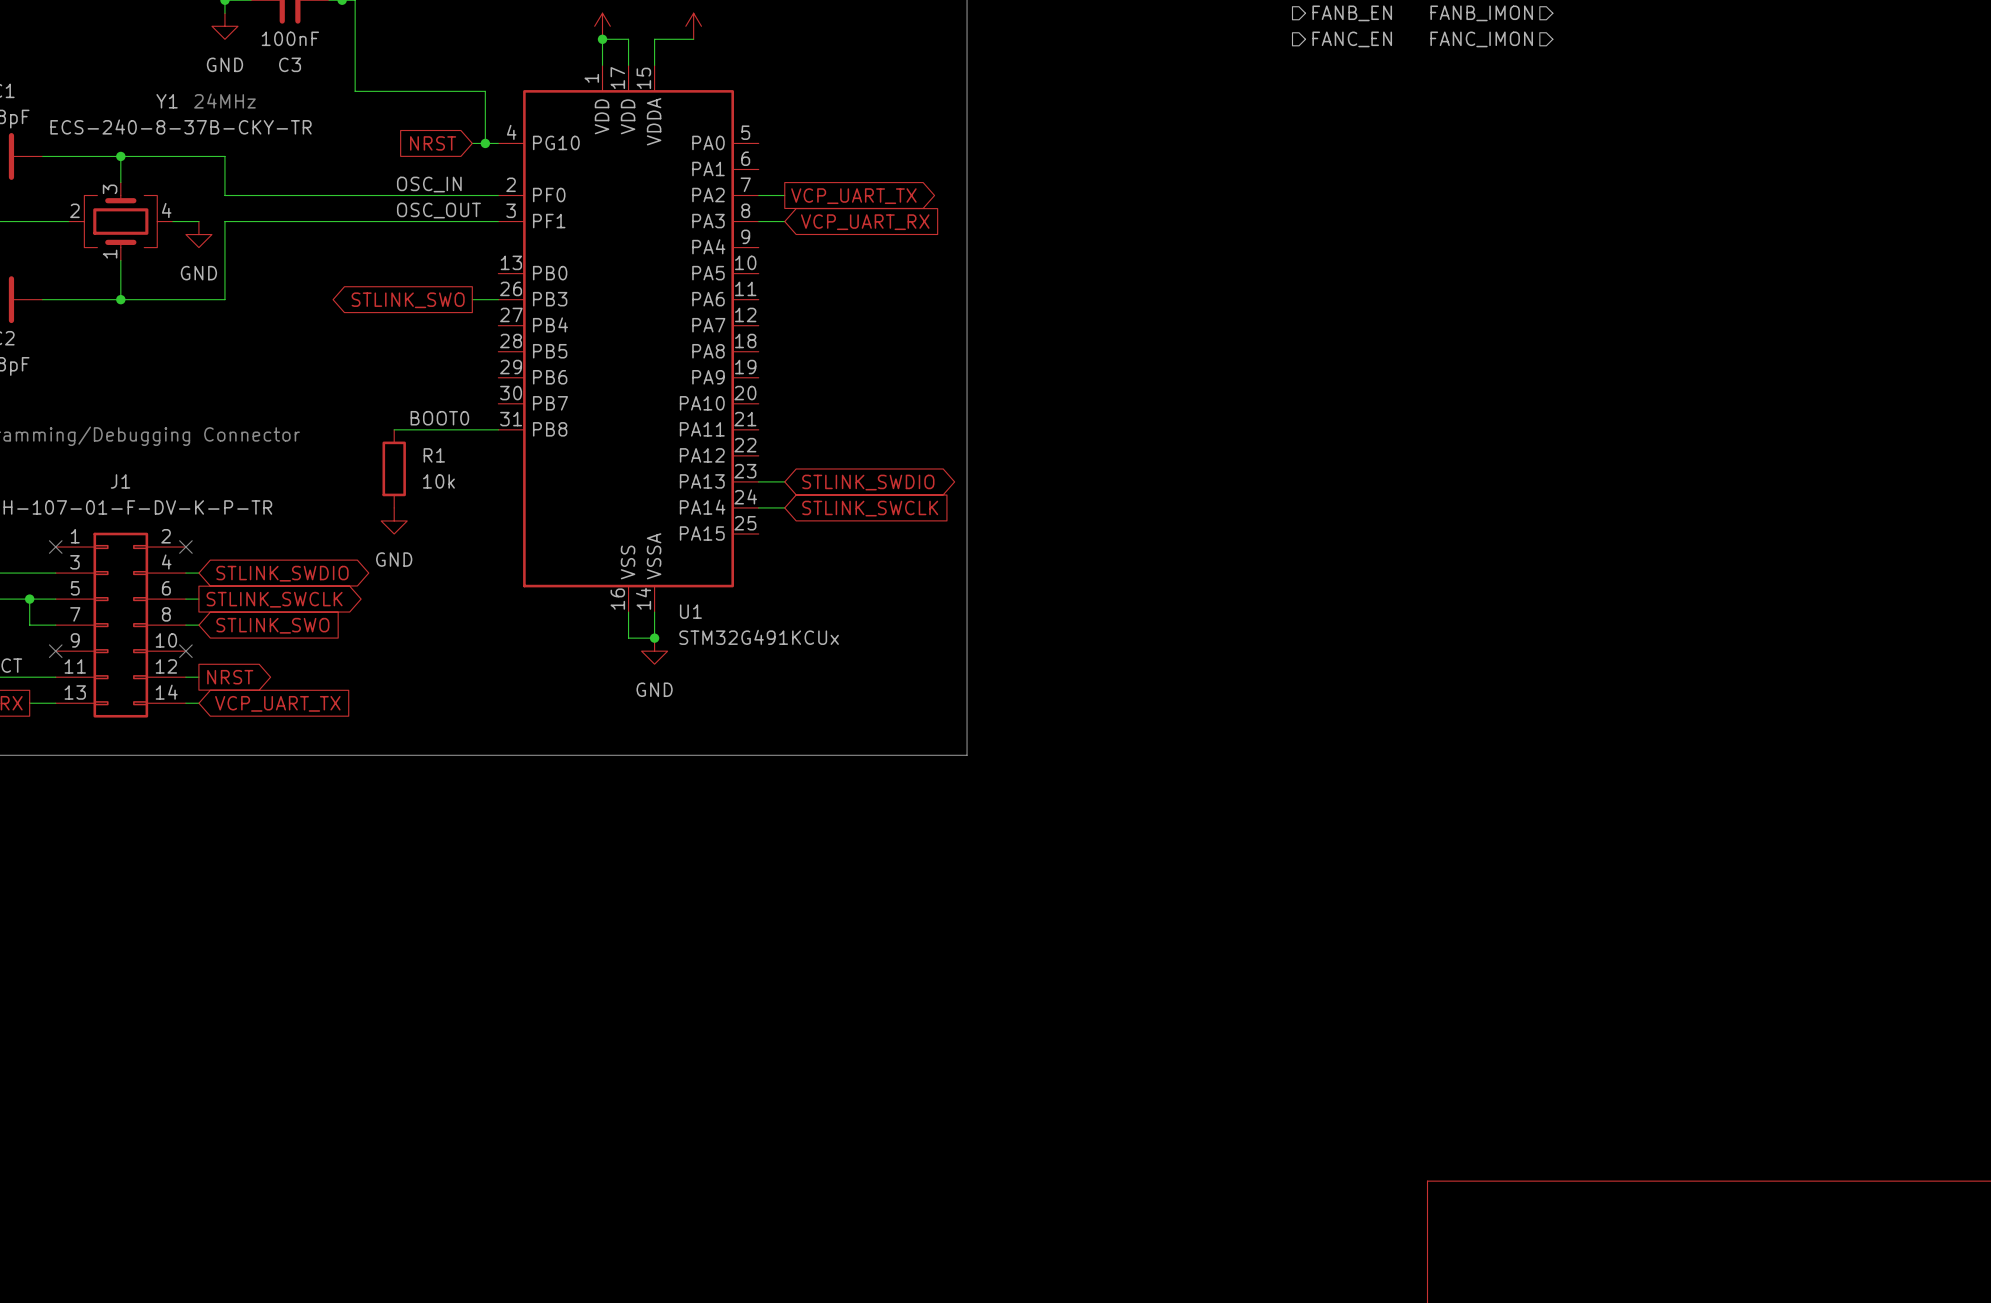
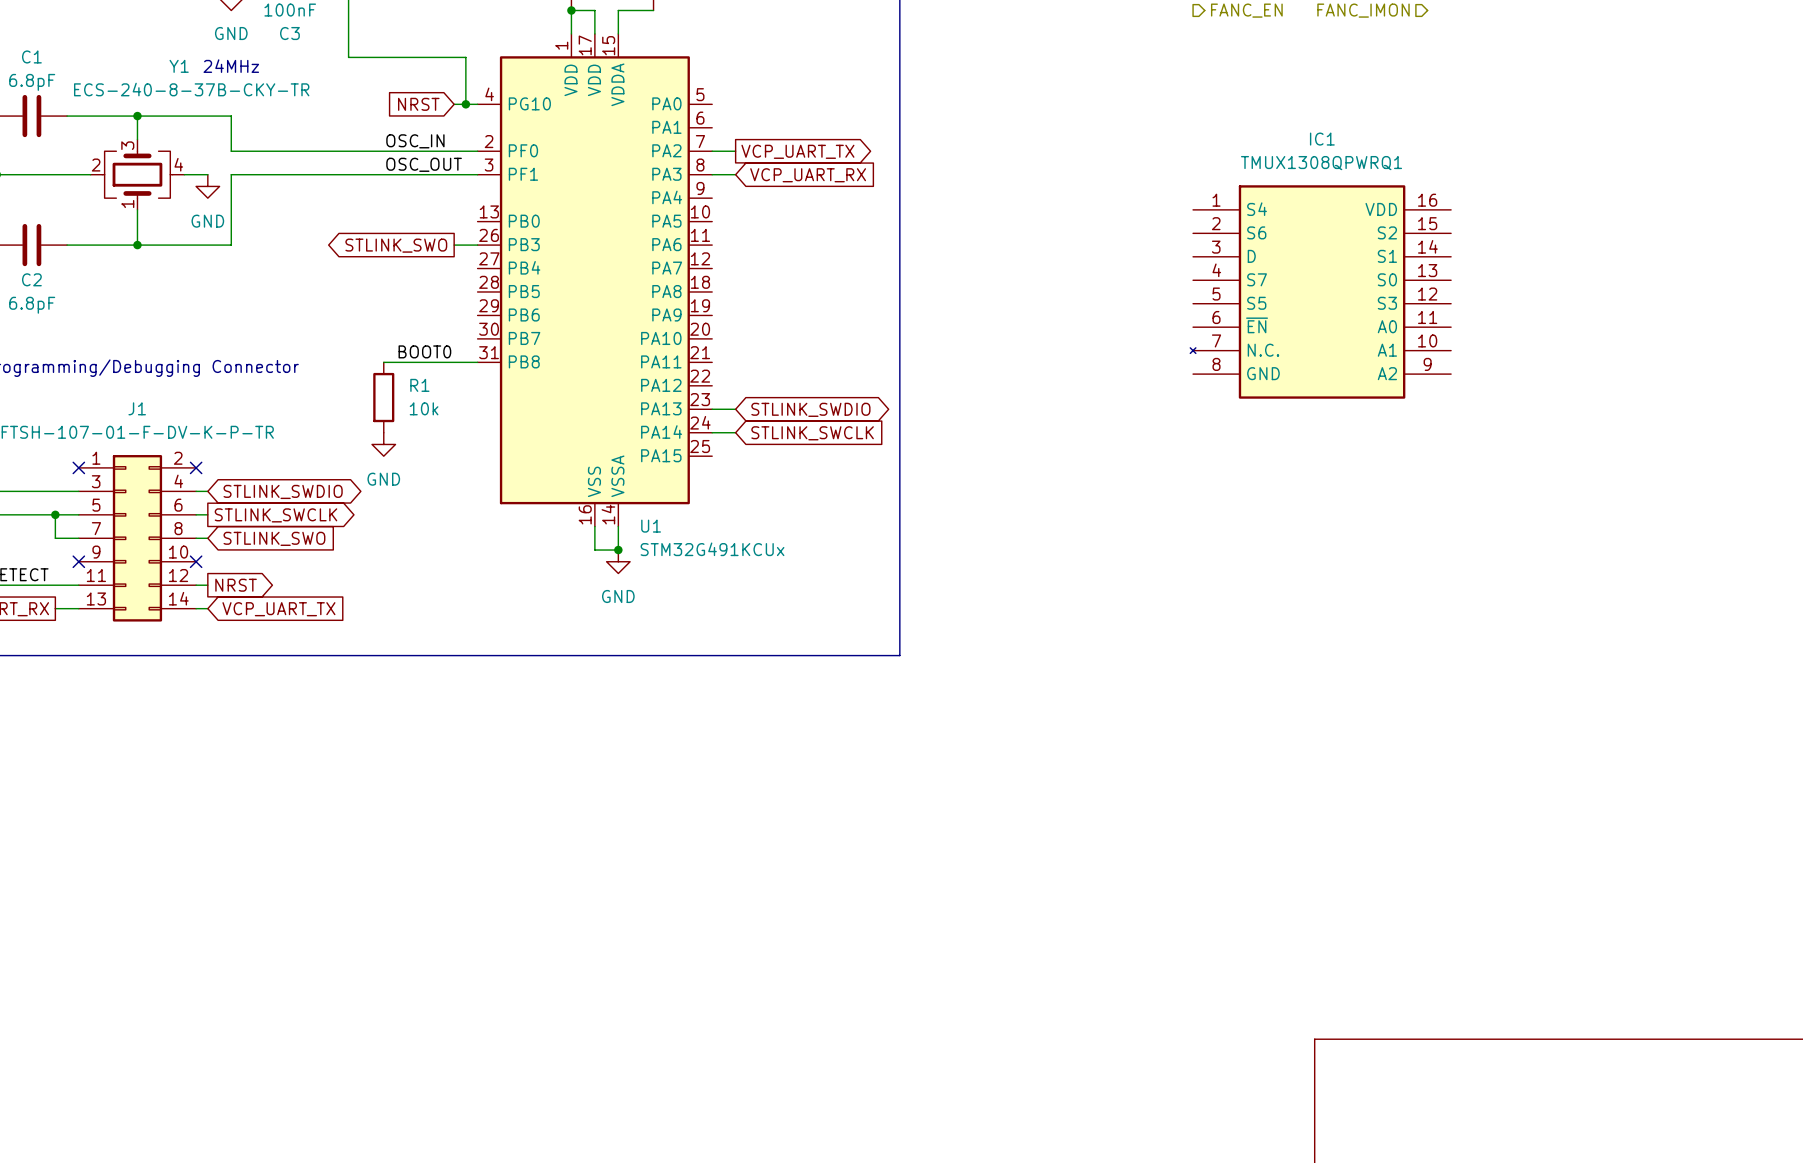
IC1: none -> TMUX1308QPWRQ1 (1320, 291)

